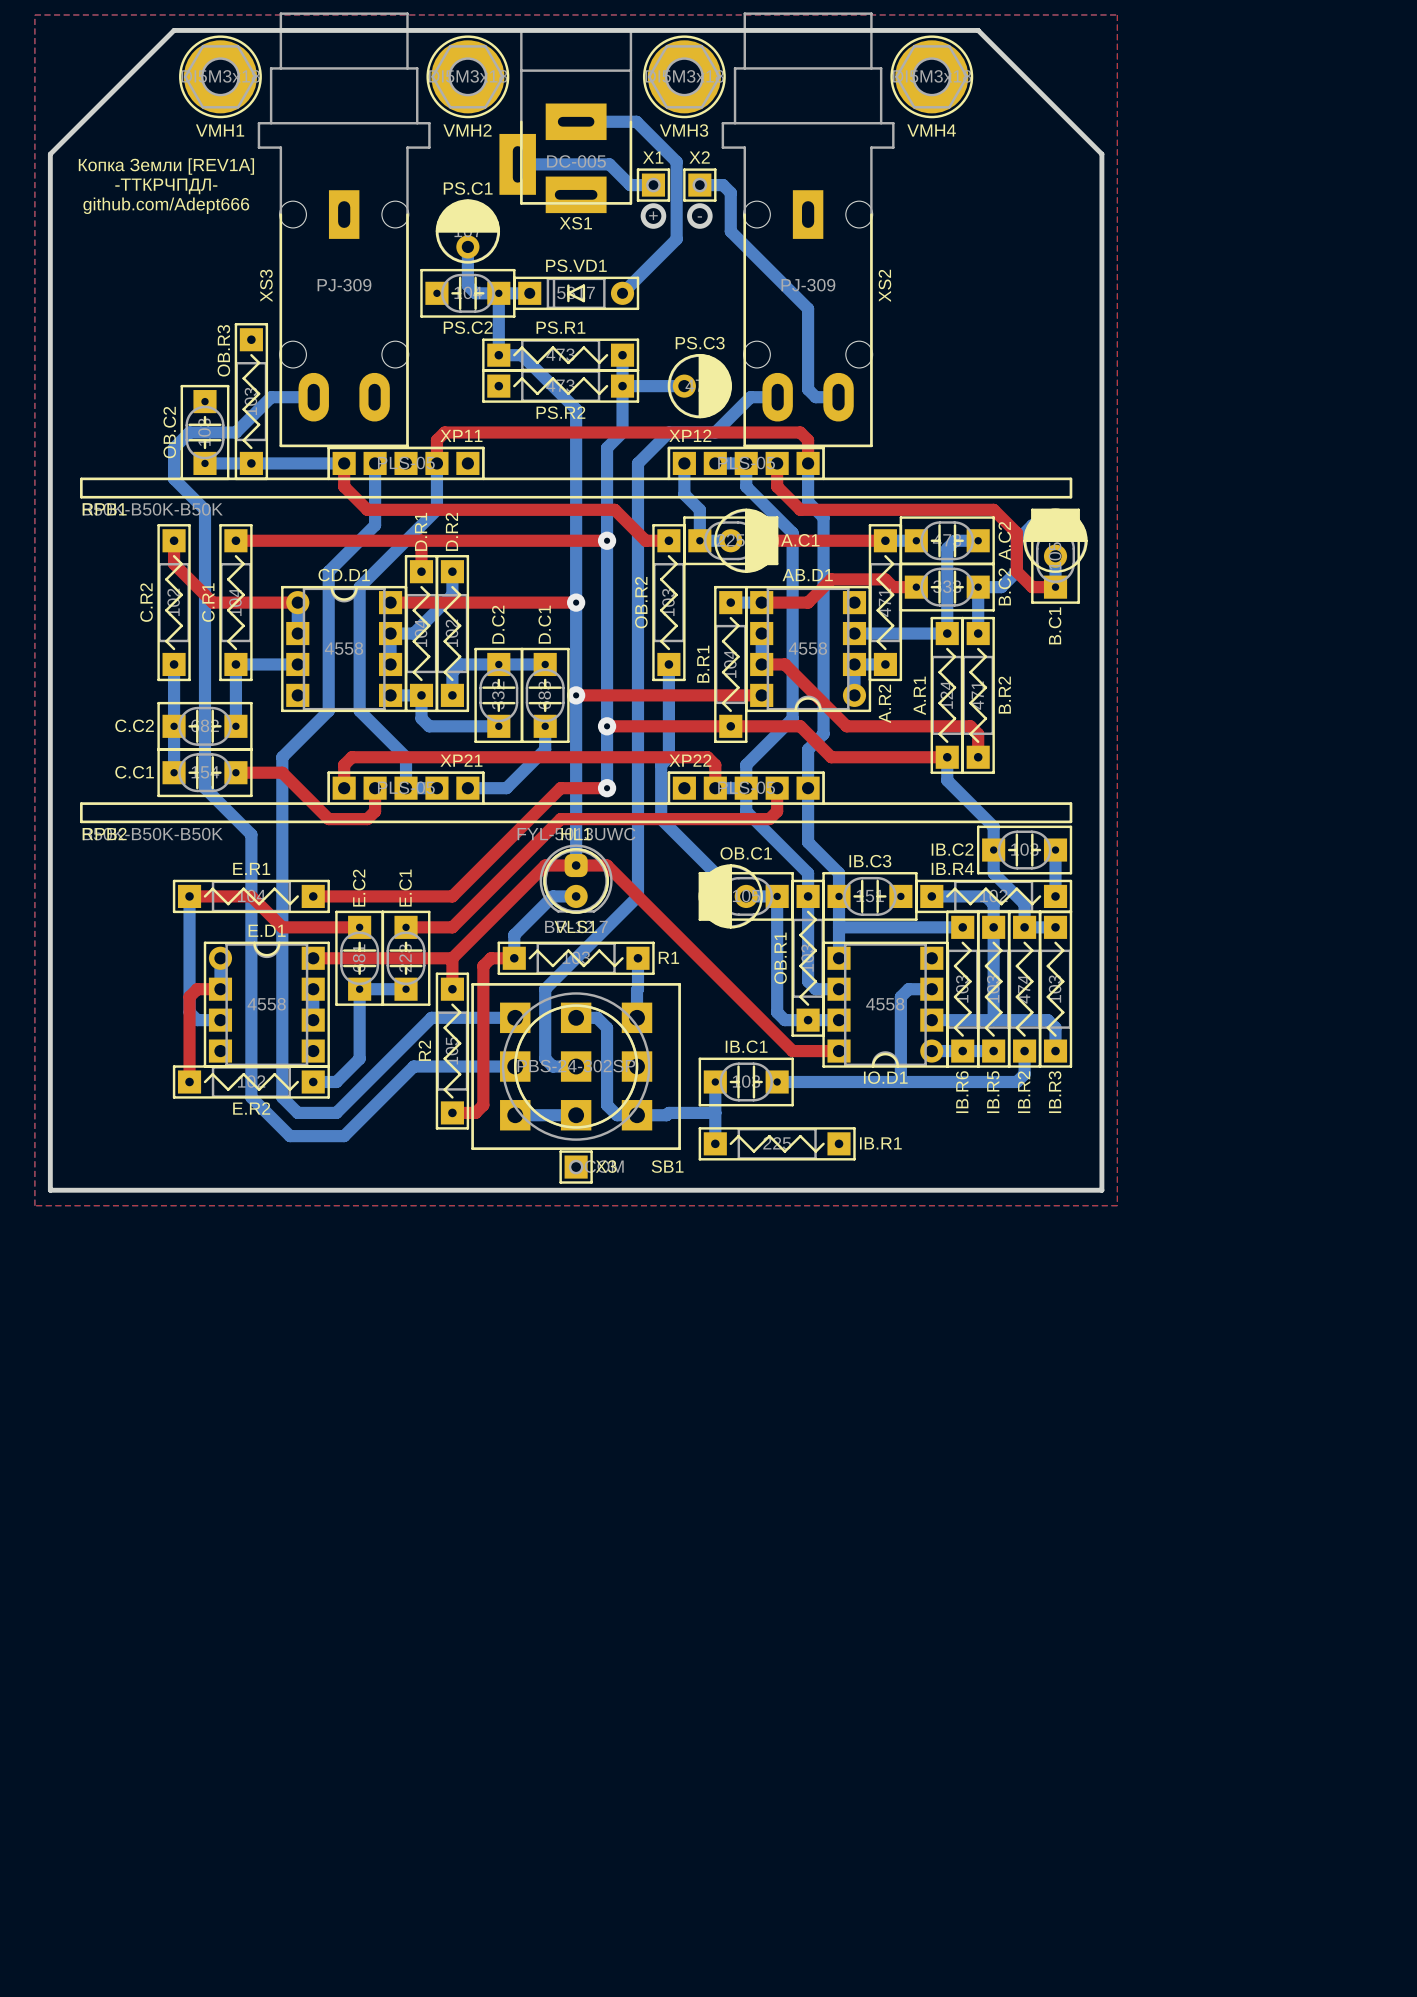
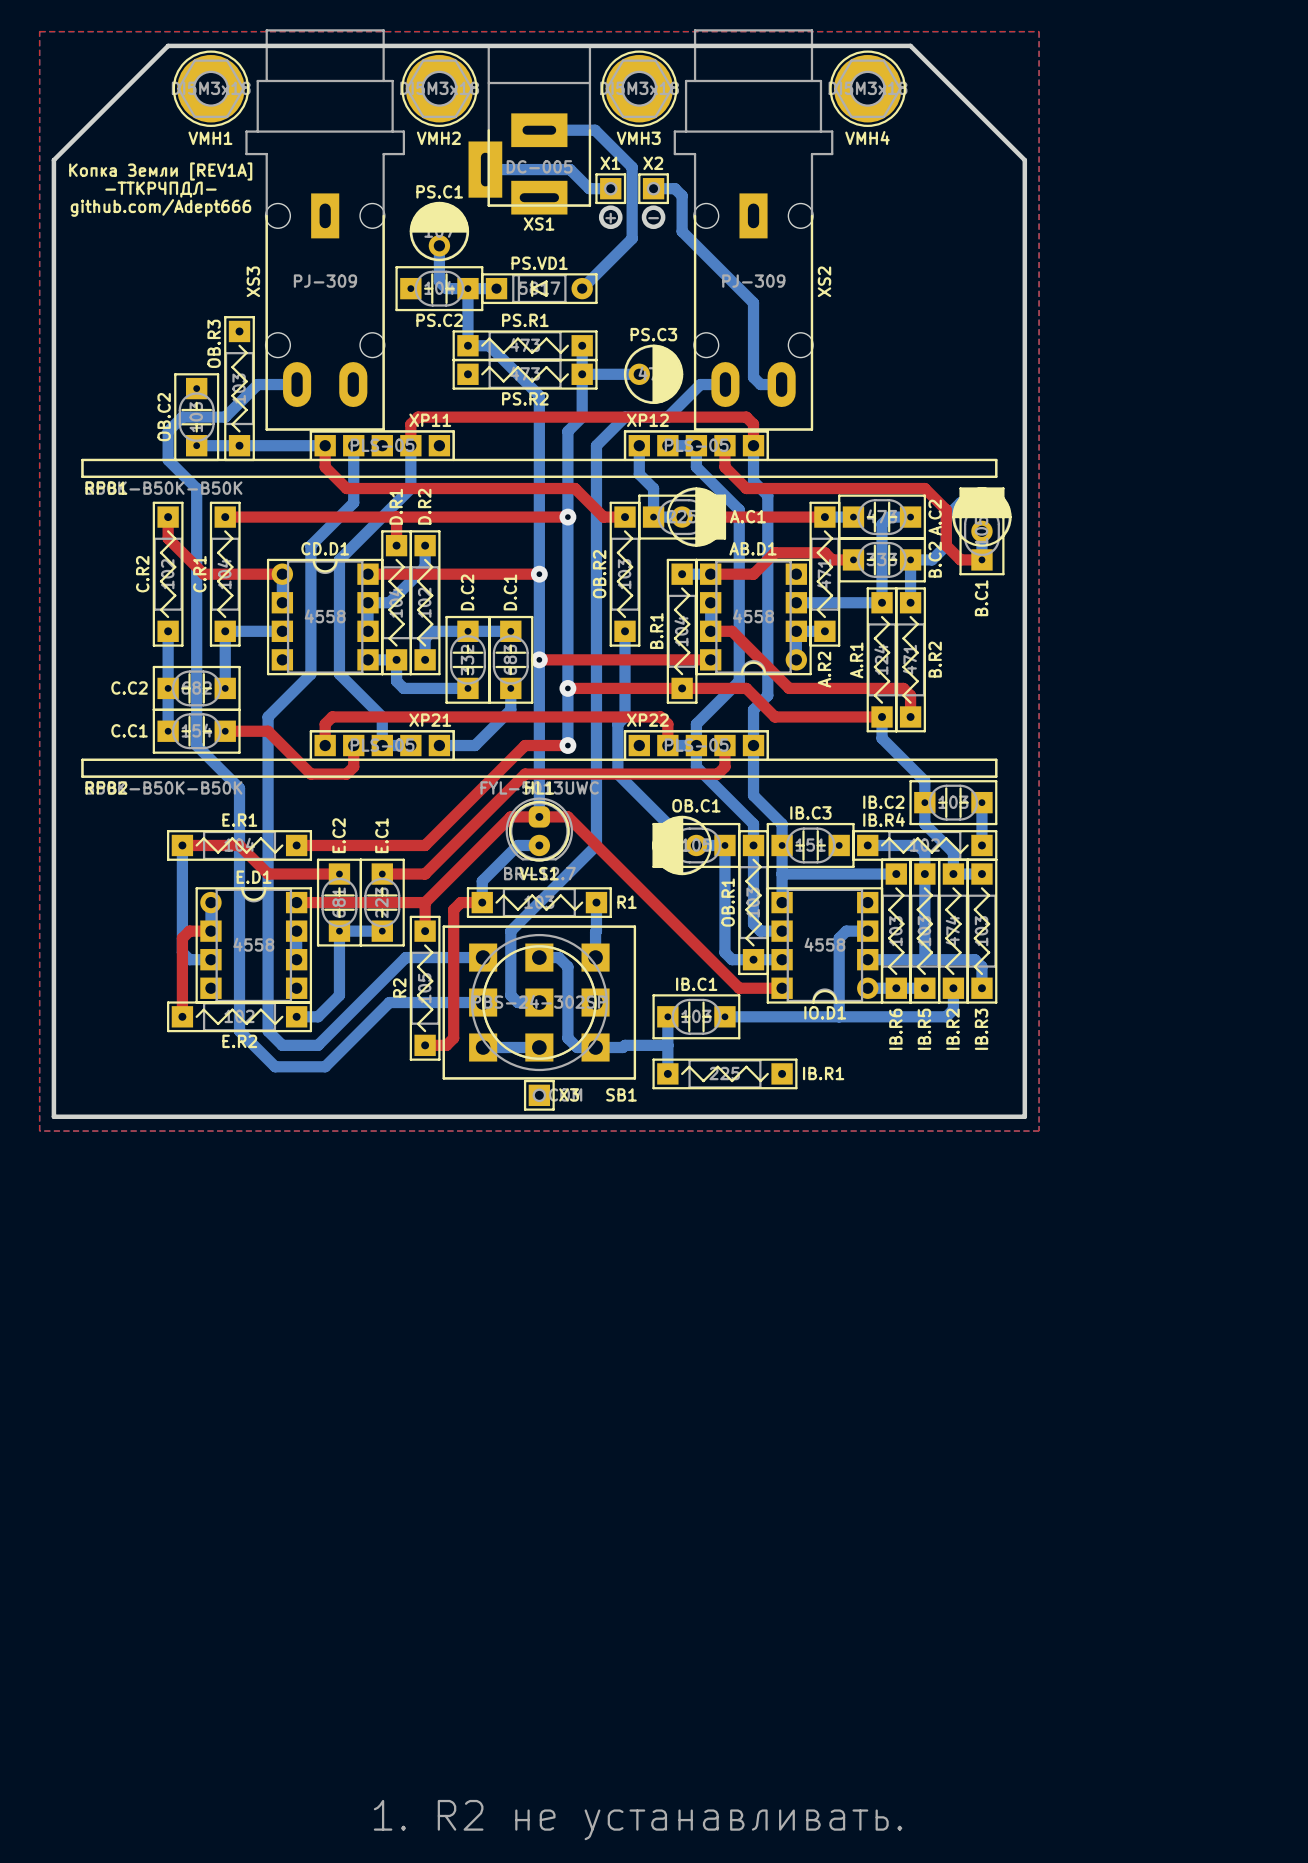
text: none -> 1. R2 не устанавливать. (638, 1820)

